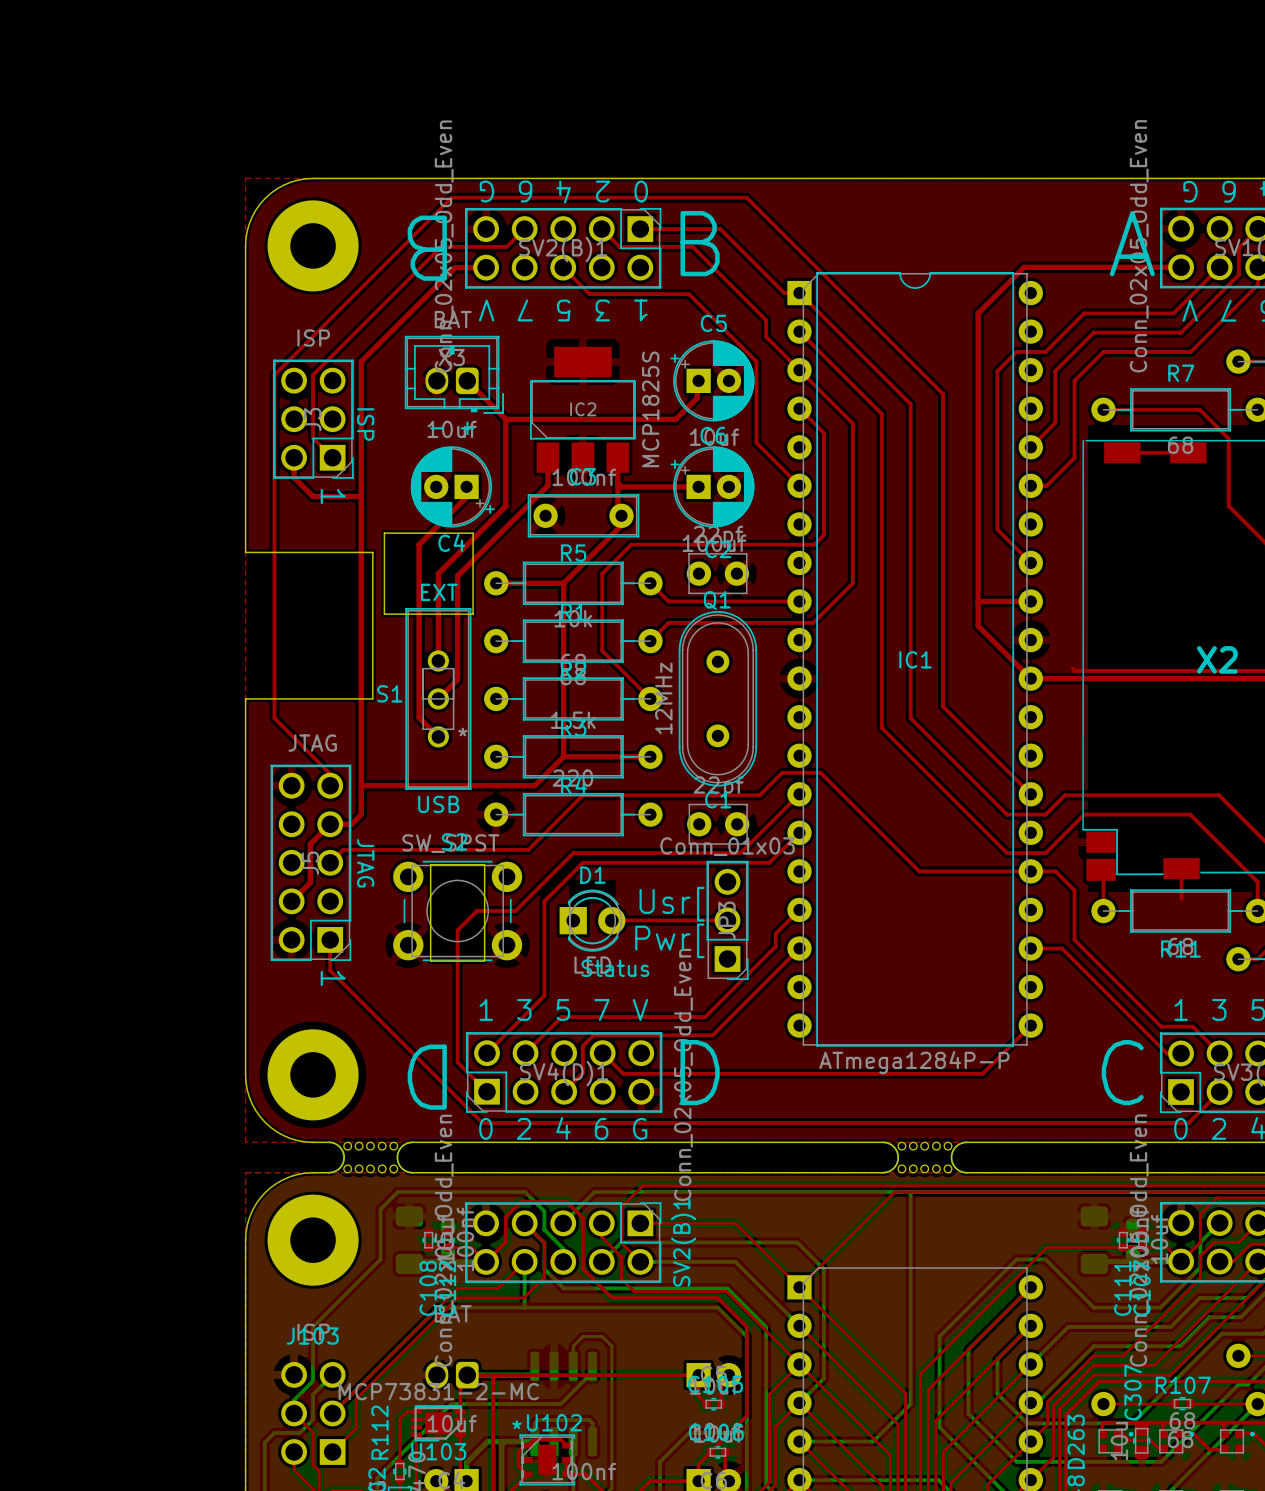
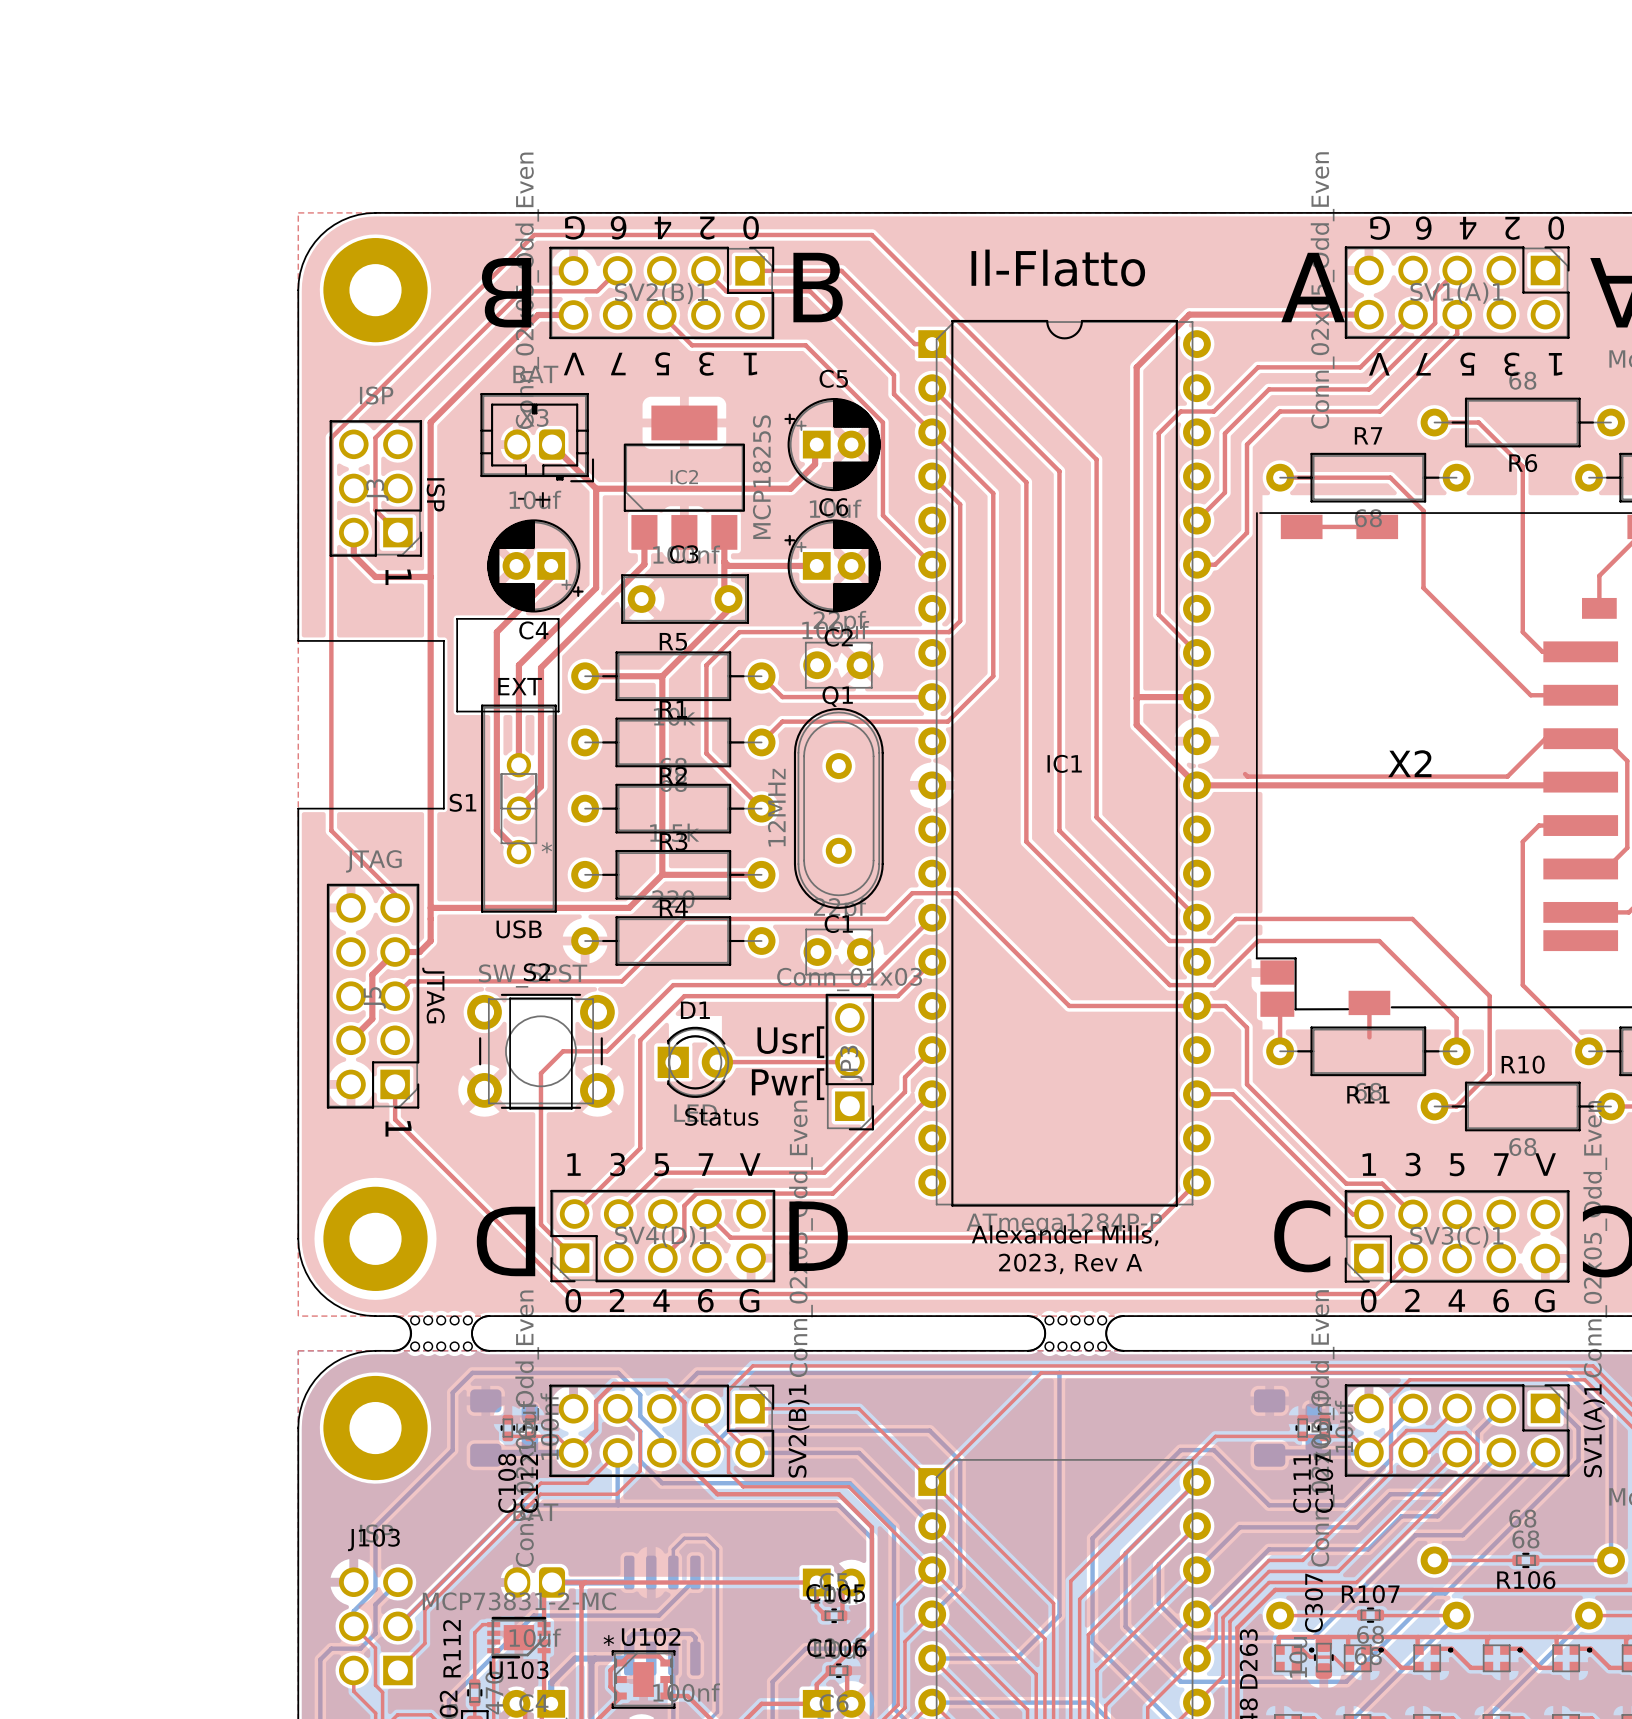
text: none -> Il-Flatto (1058, 268)
text: none -> Alexander Mills, (1065, 1235)
text: none -> 2023, Rev A (1070, 1263)

